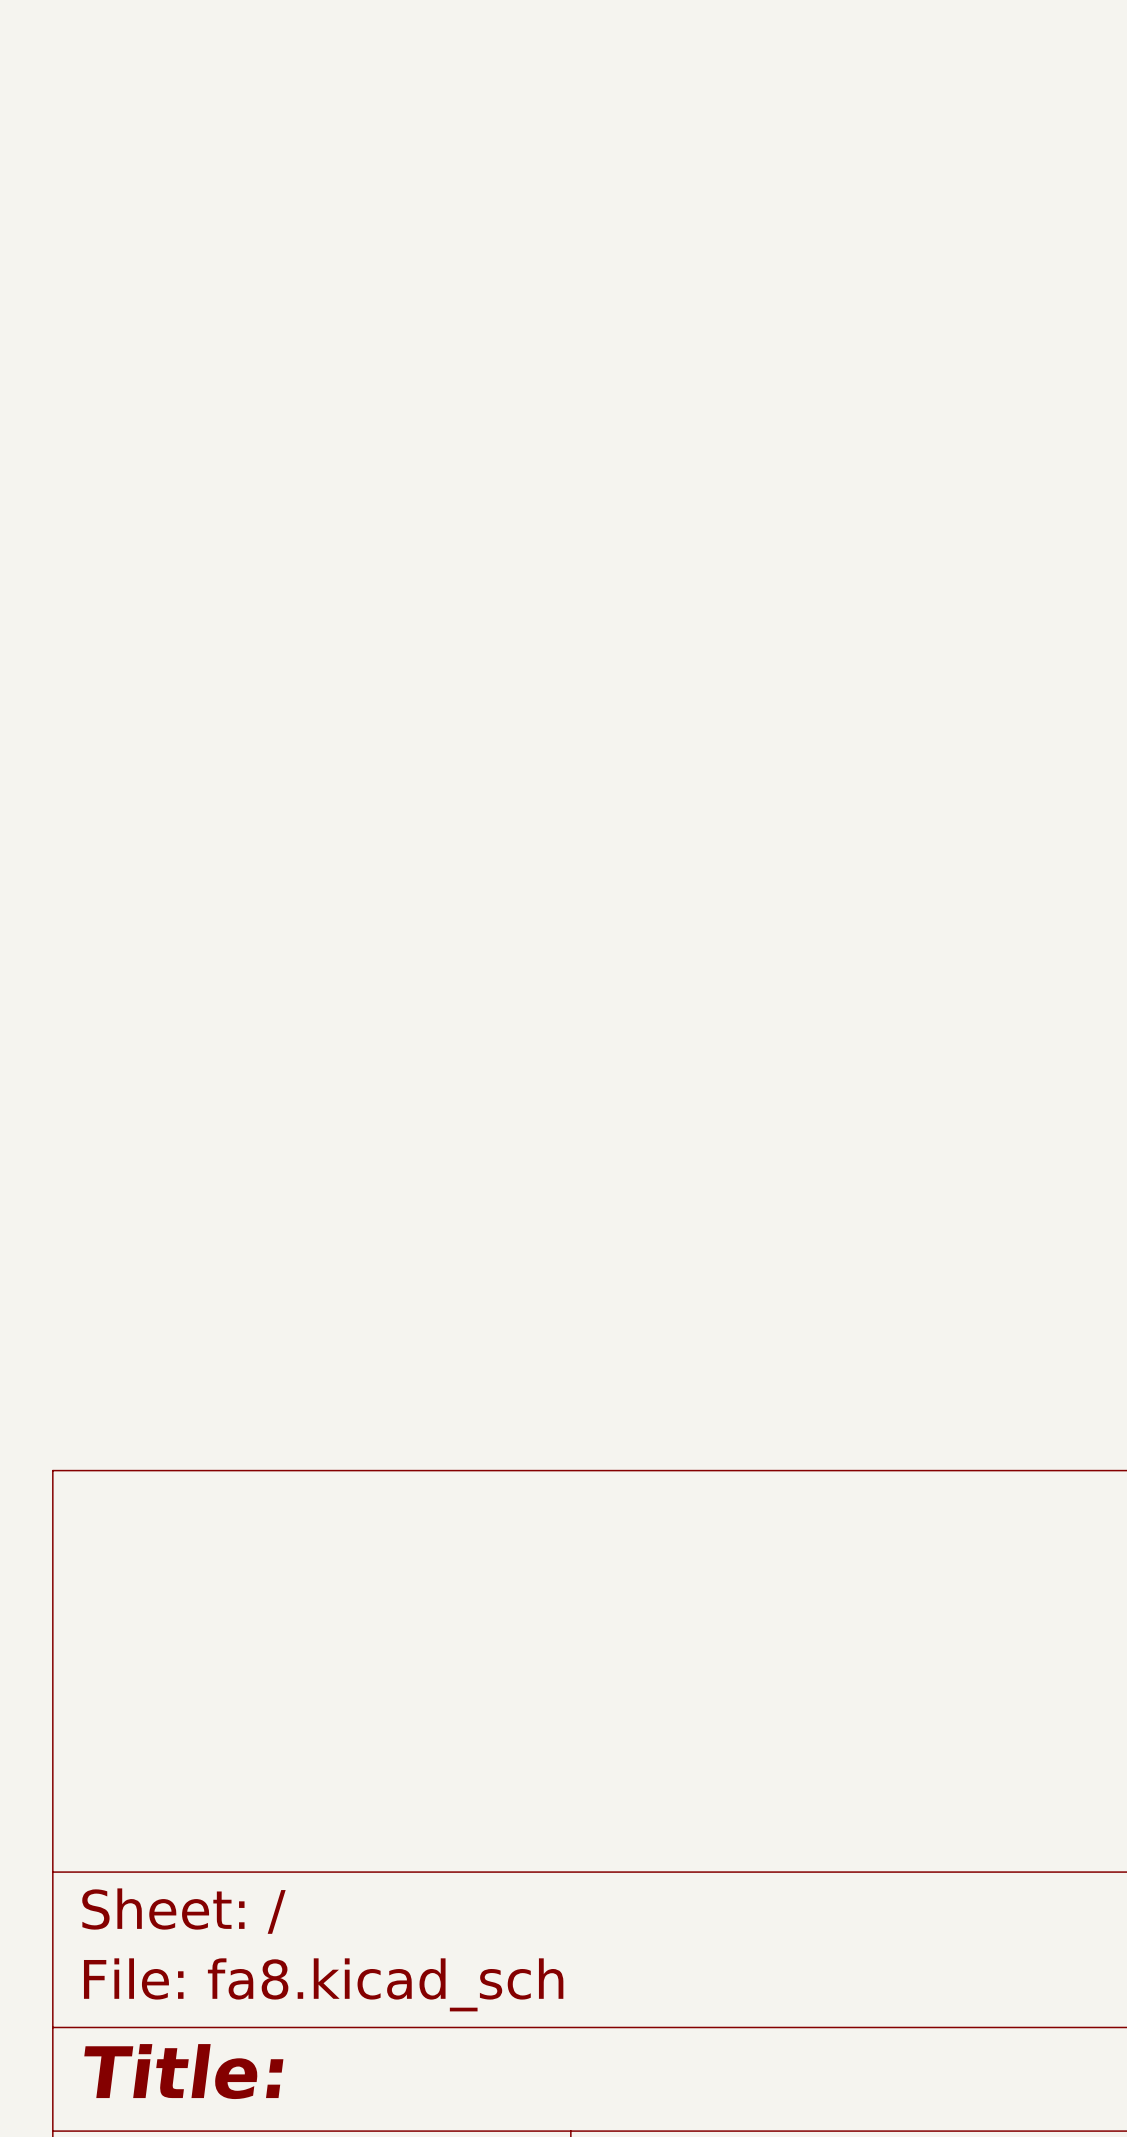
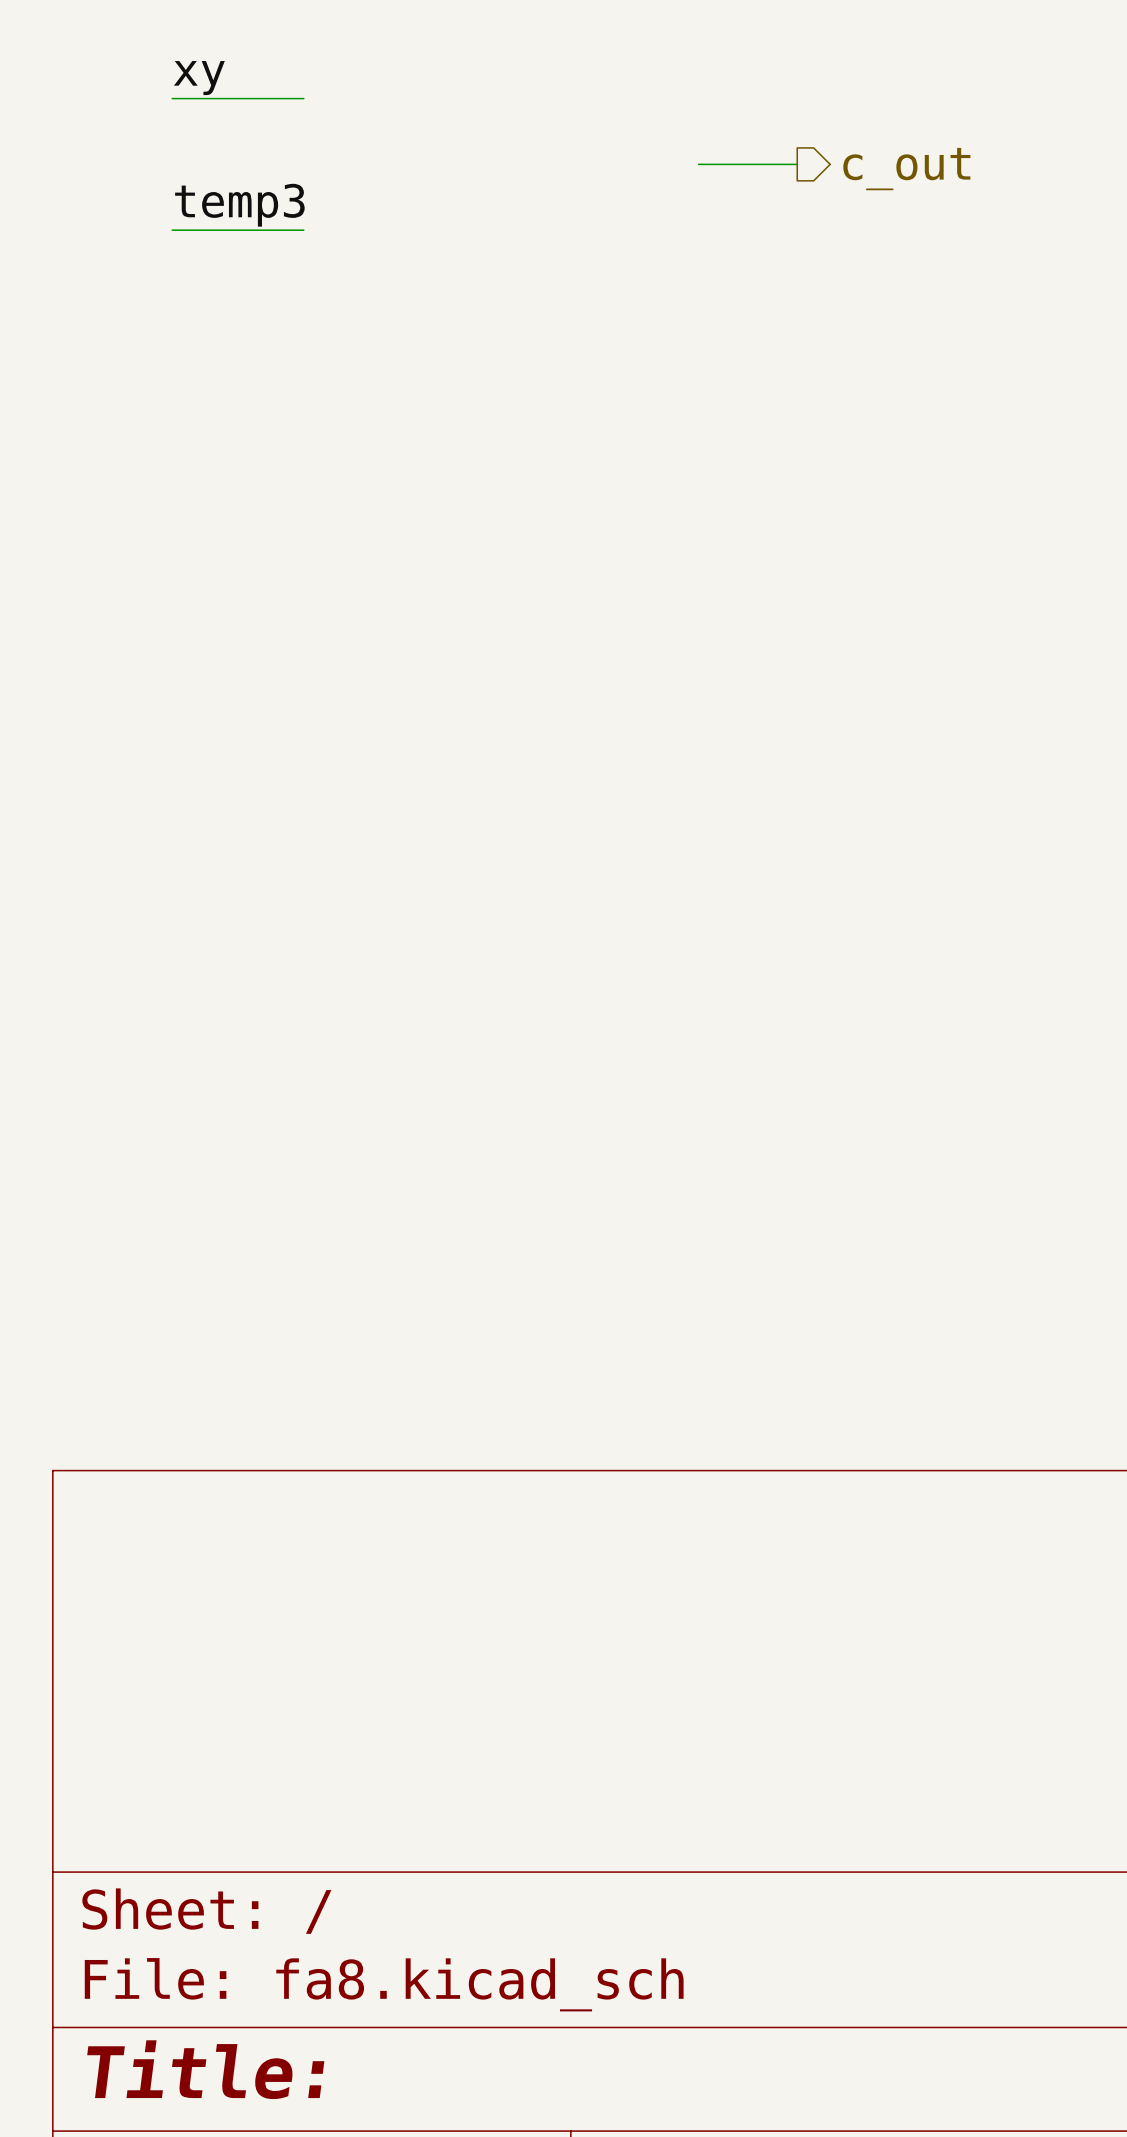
label: none -> xy (199, 78)
wire: none -> (172, 98) (303, 98)
wire: none -> (698, 164) (797, 164)
hierarchical label: none -> c_out (906, 169)
label: none -> temp3 (239, 205)
wire: none -> (172, 230) (303, 230)

